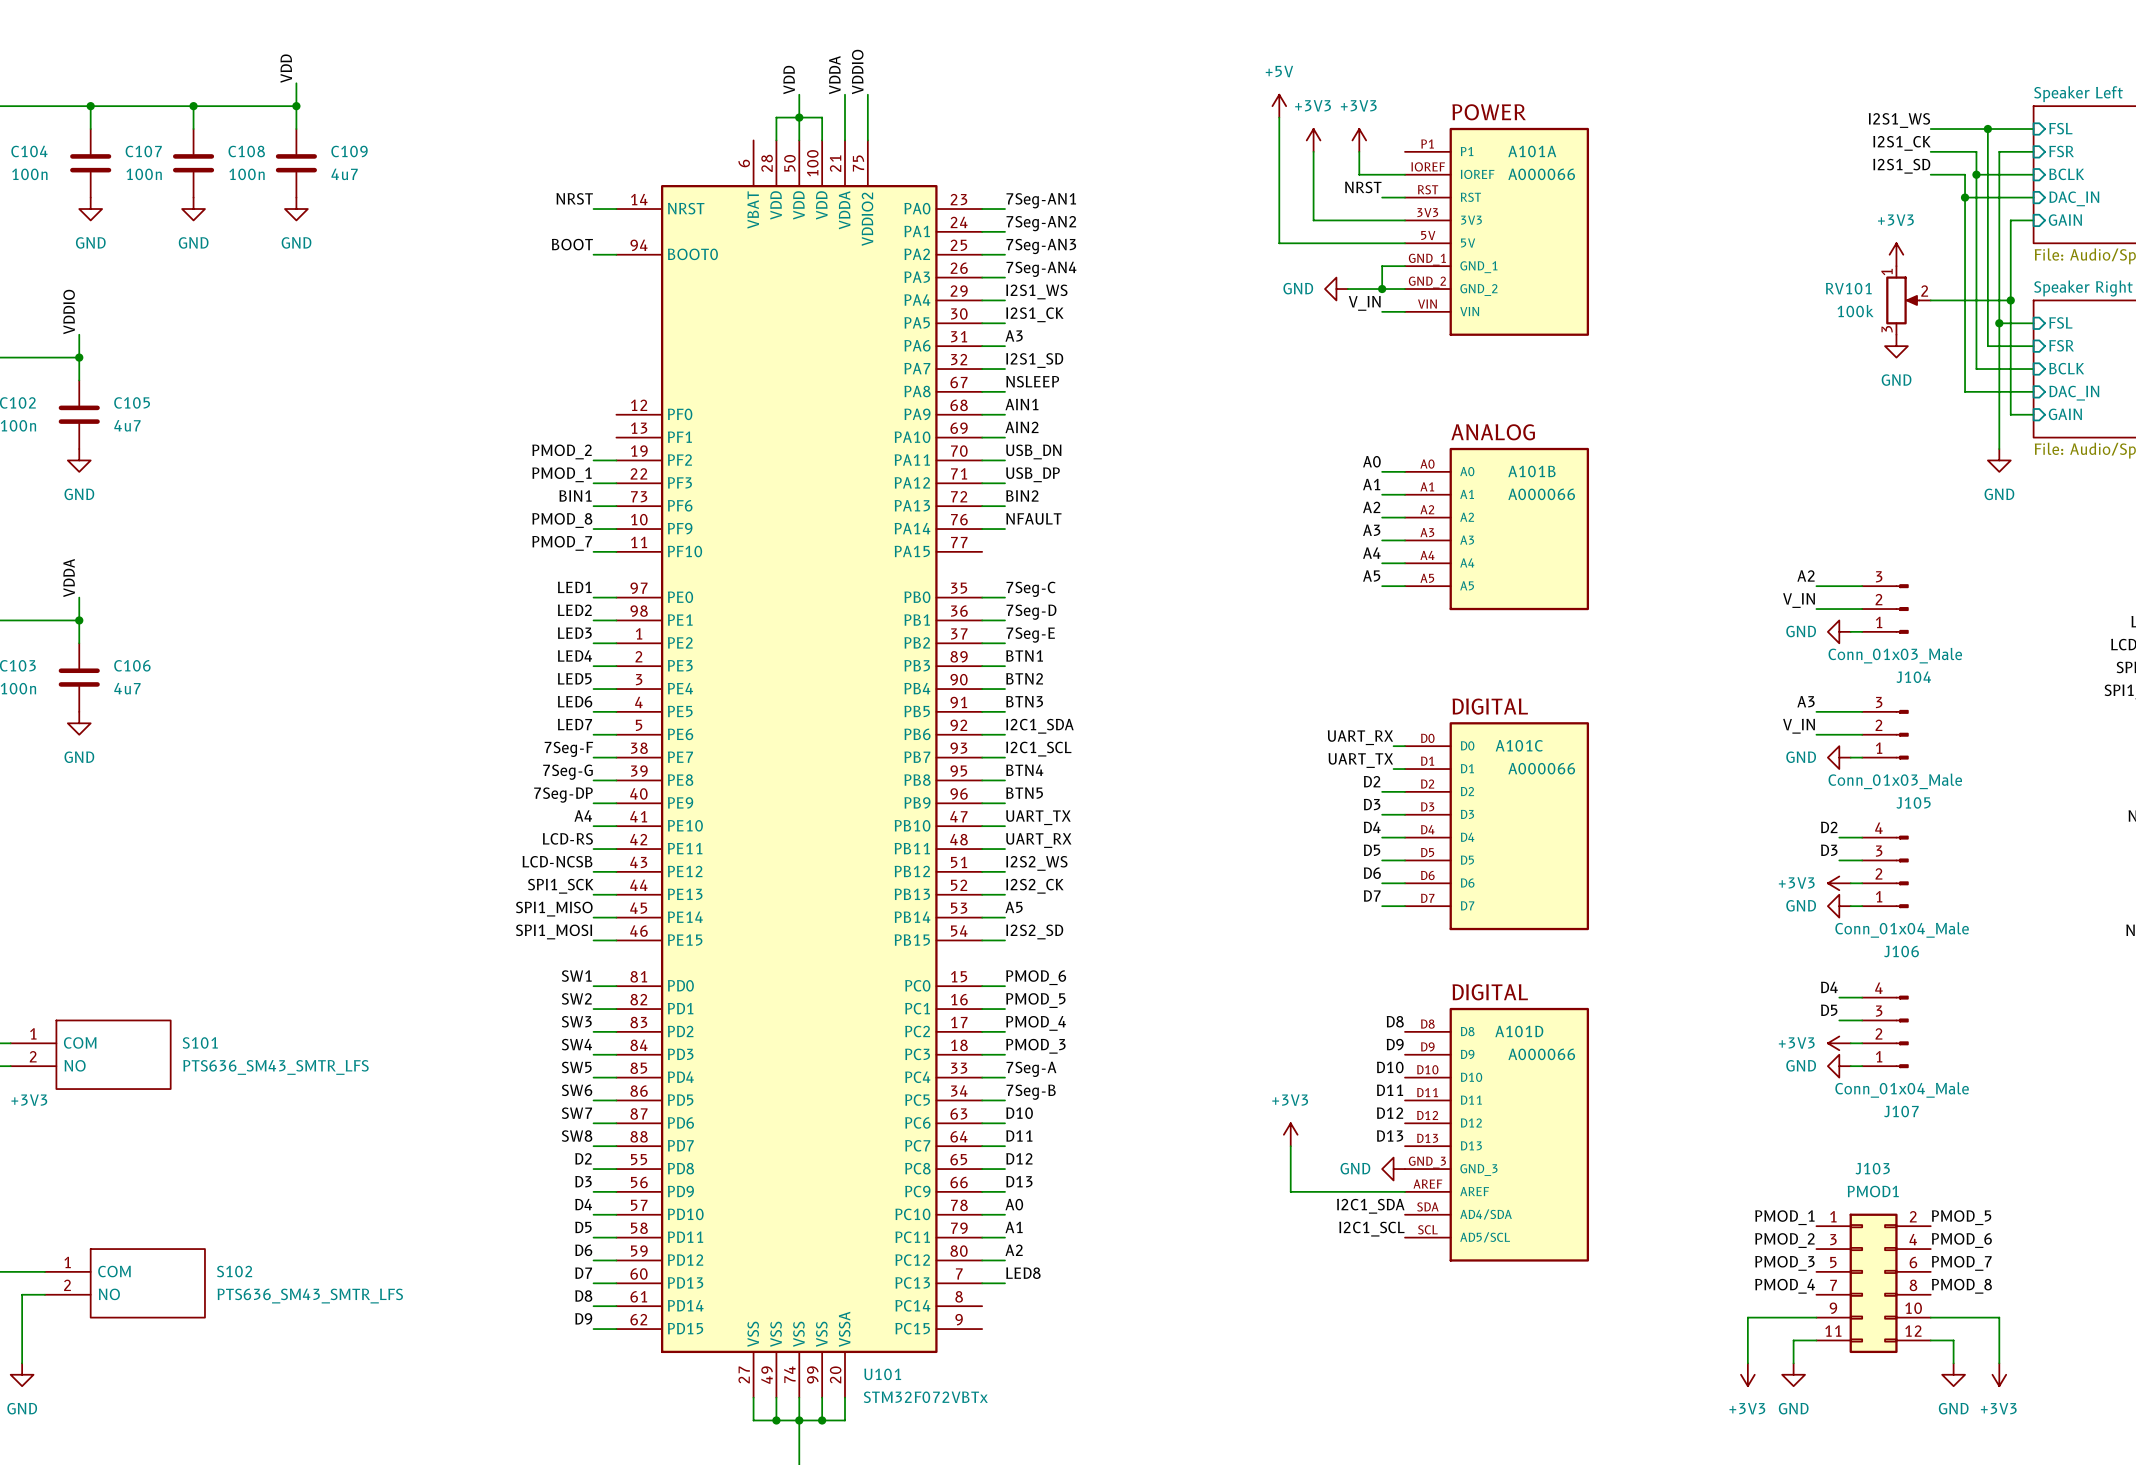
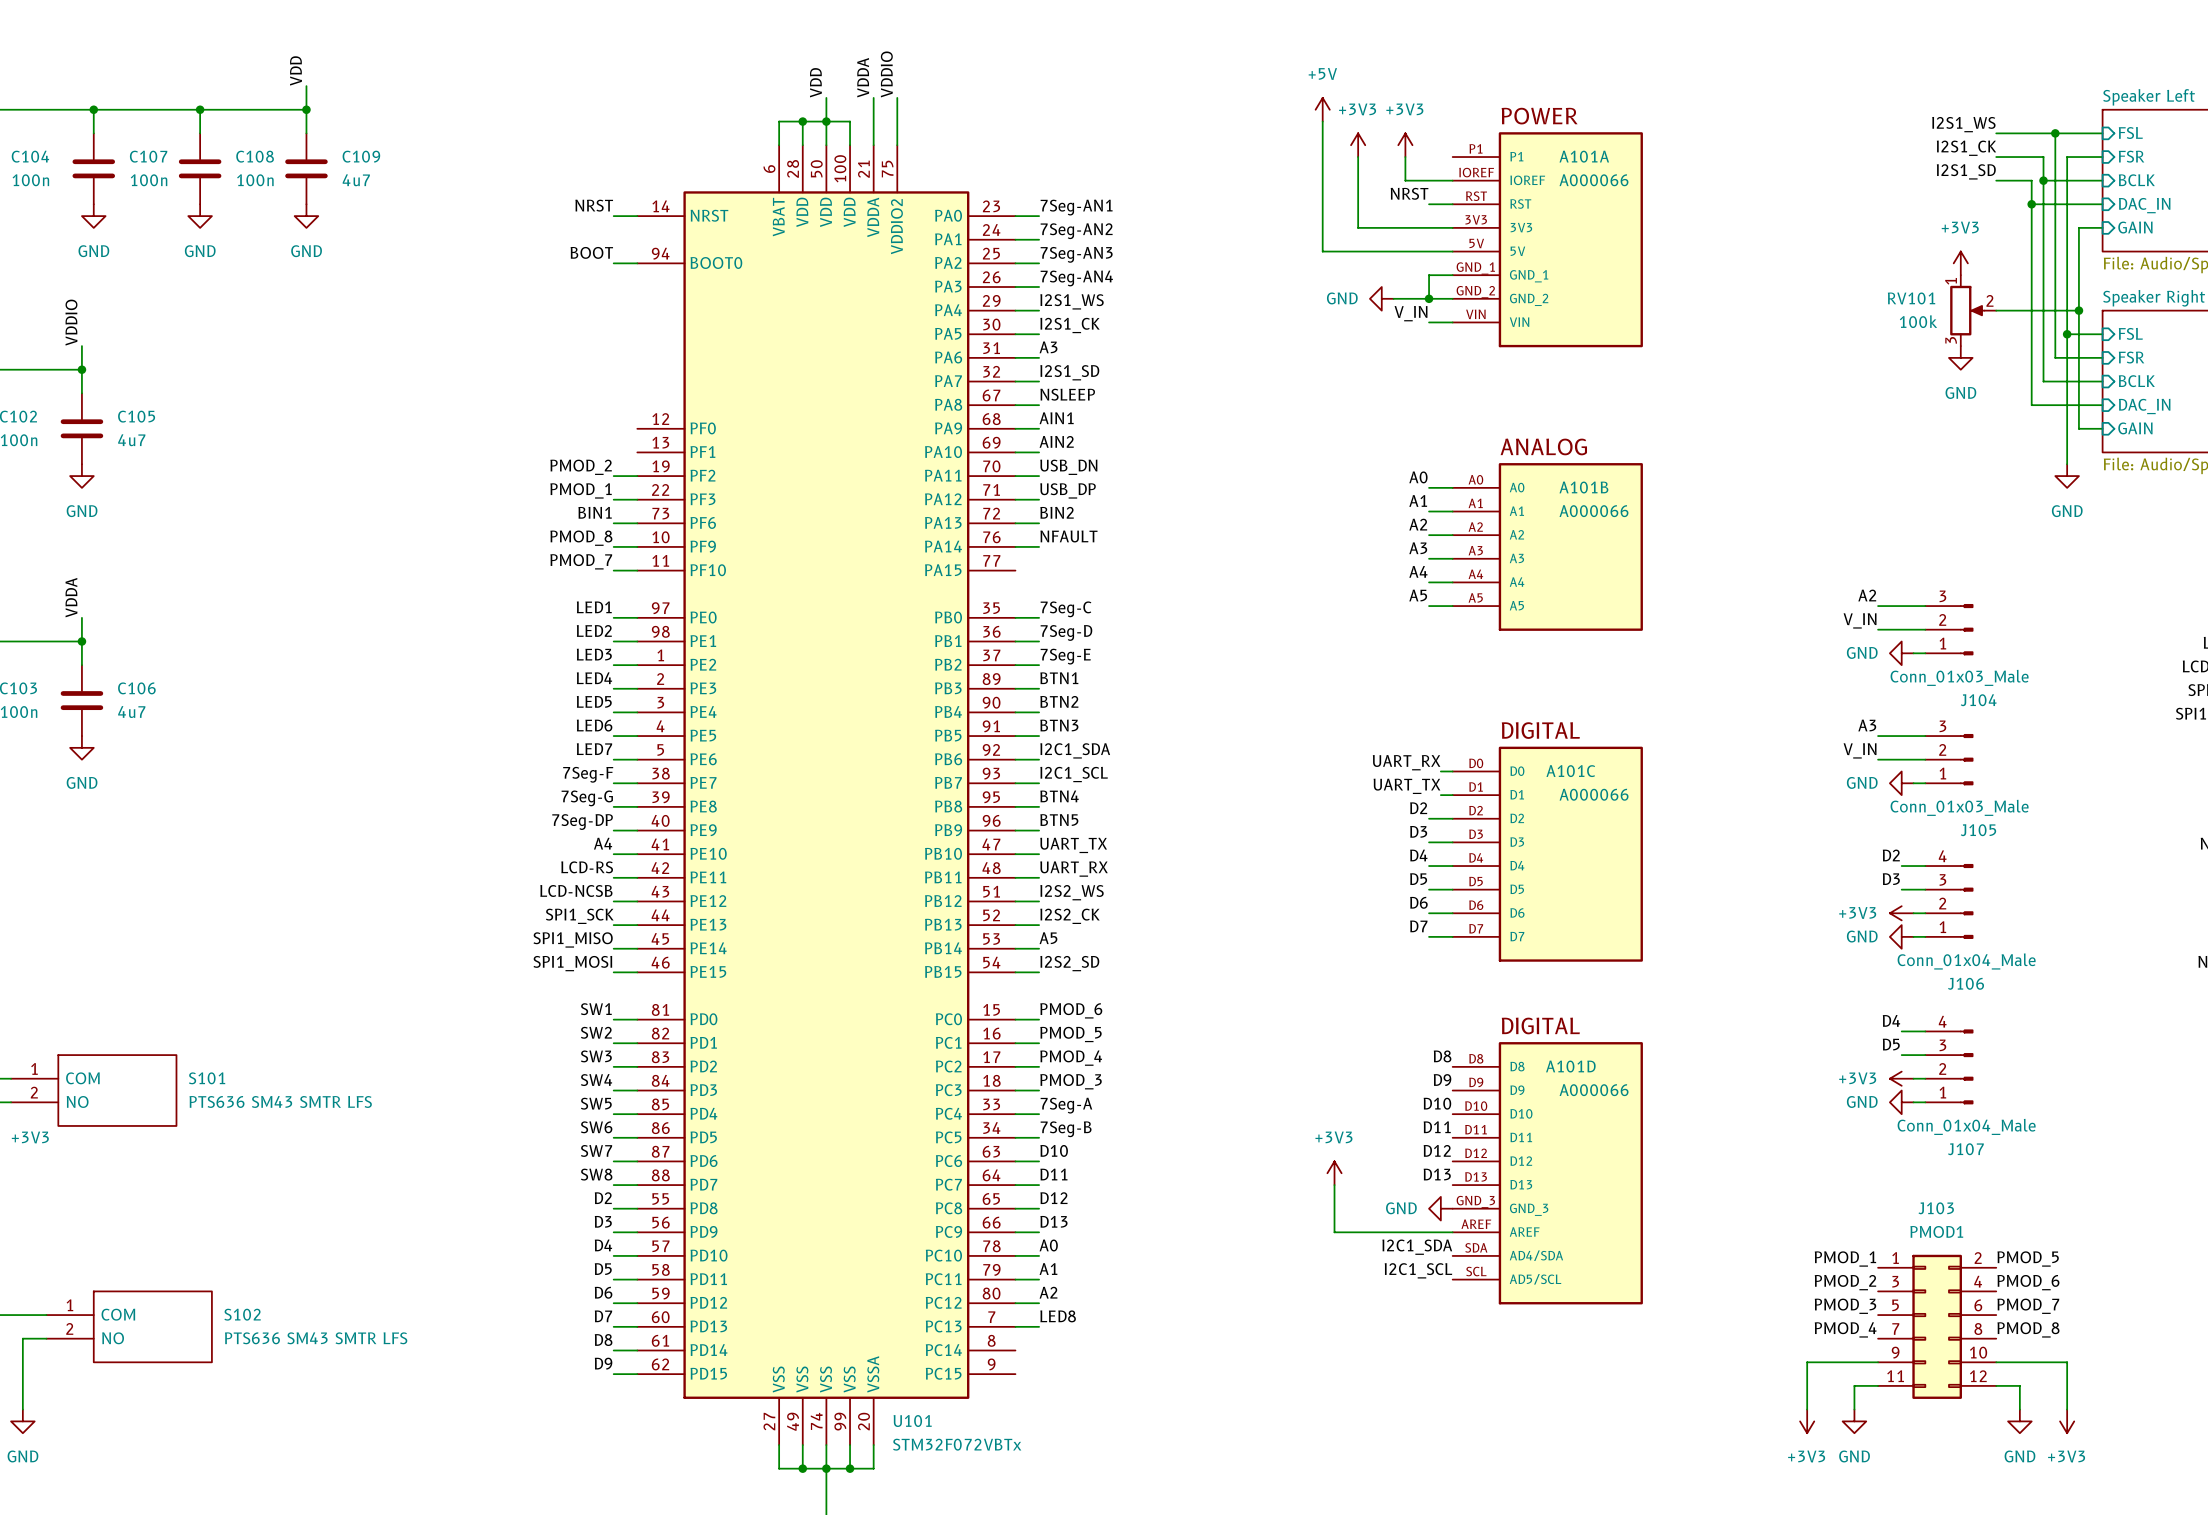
wire: none -> (802, 121) (779, 121) (779, 145)
junction: none -> (802, 121)
S101 value: PTS636_SM43_SMTR_LFS (275, 1067) -> PTS636 SM43 SMTR LFS (280, 1101)
S102 value: PTS636_SM43_SMTR_LFS (310, 1296) -> PTS636 SM43 SMTR LFS (316, 1338)

